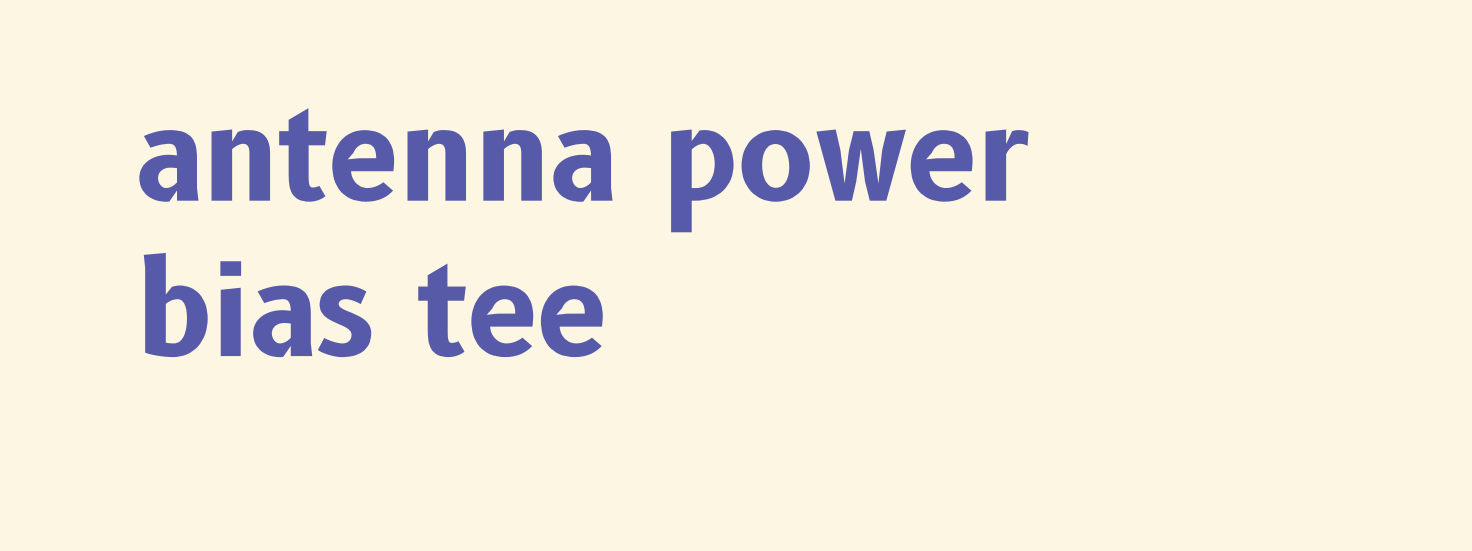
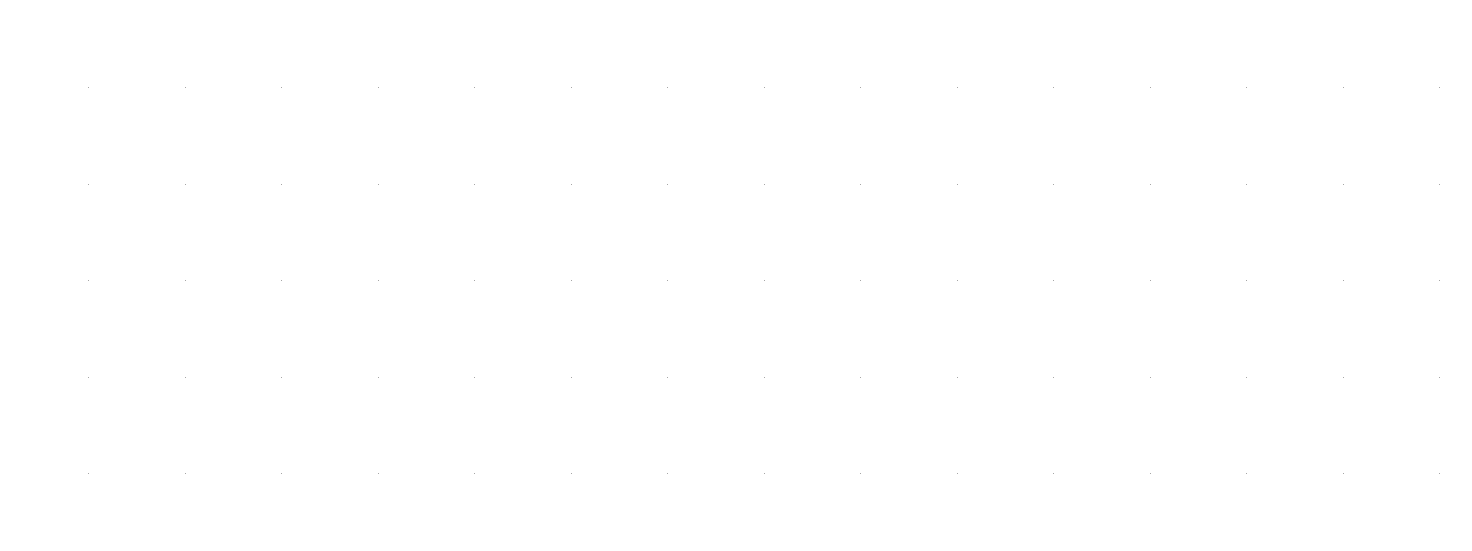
text: antenna power (583, 170) -> none
text: bias tee (373, 305) -> none

